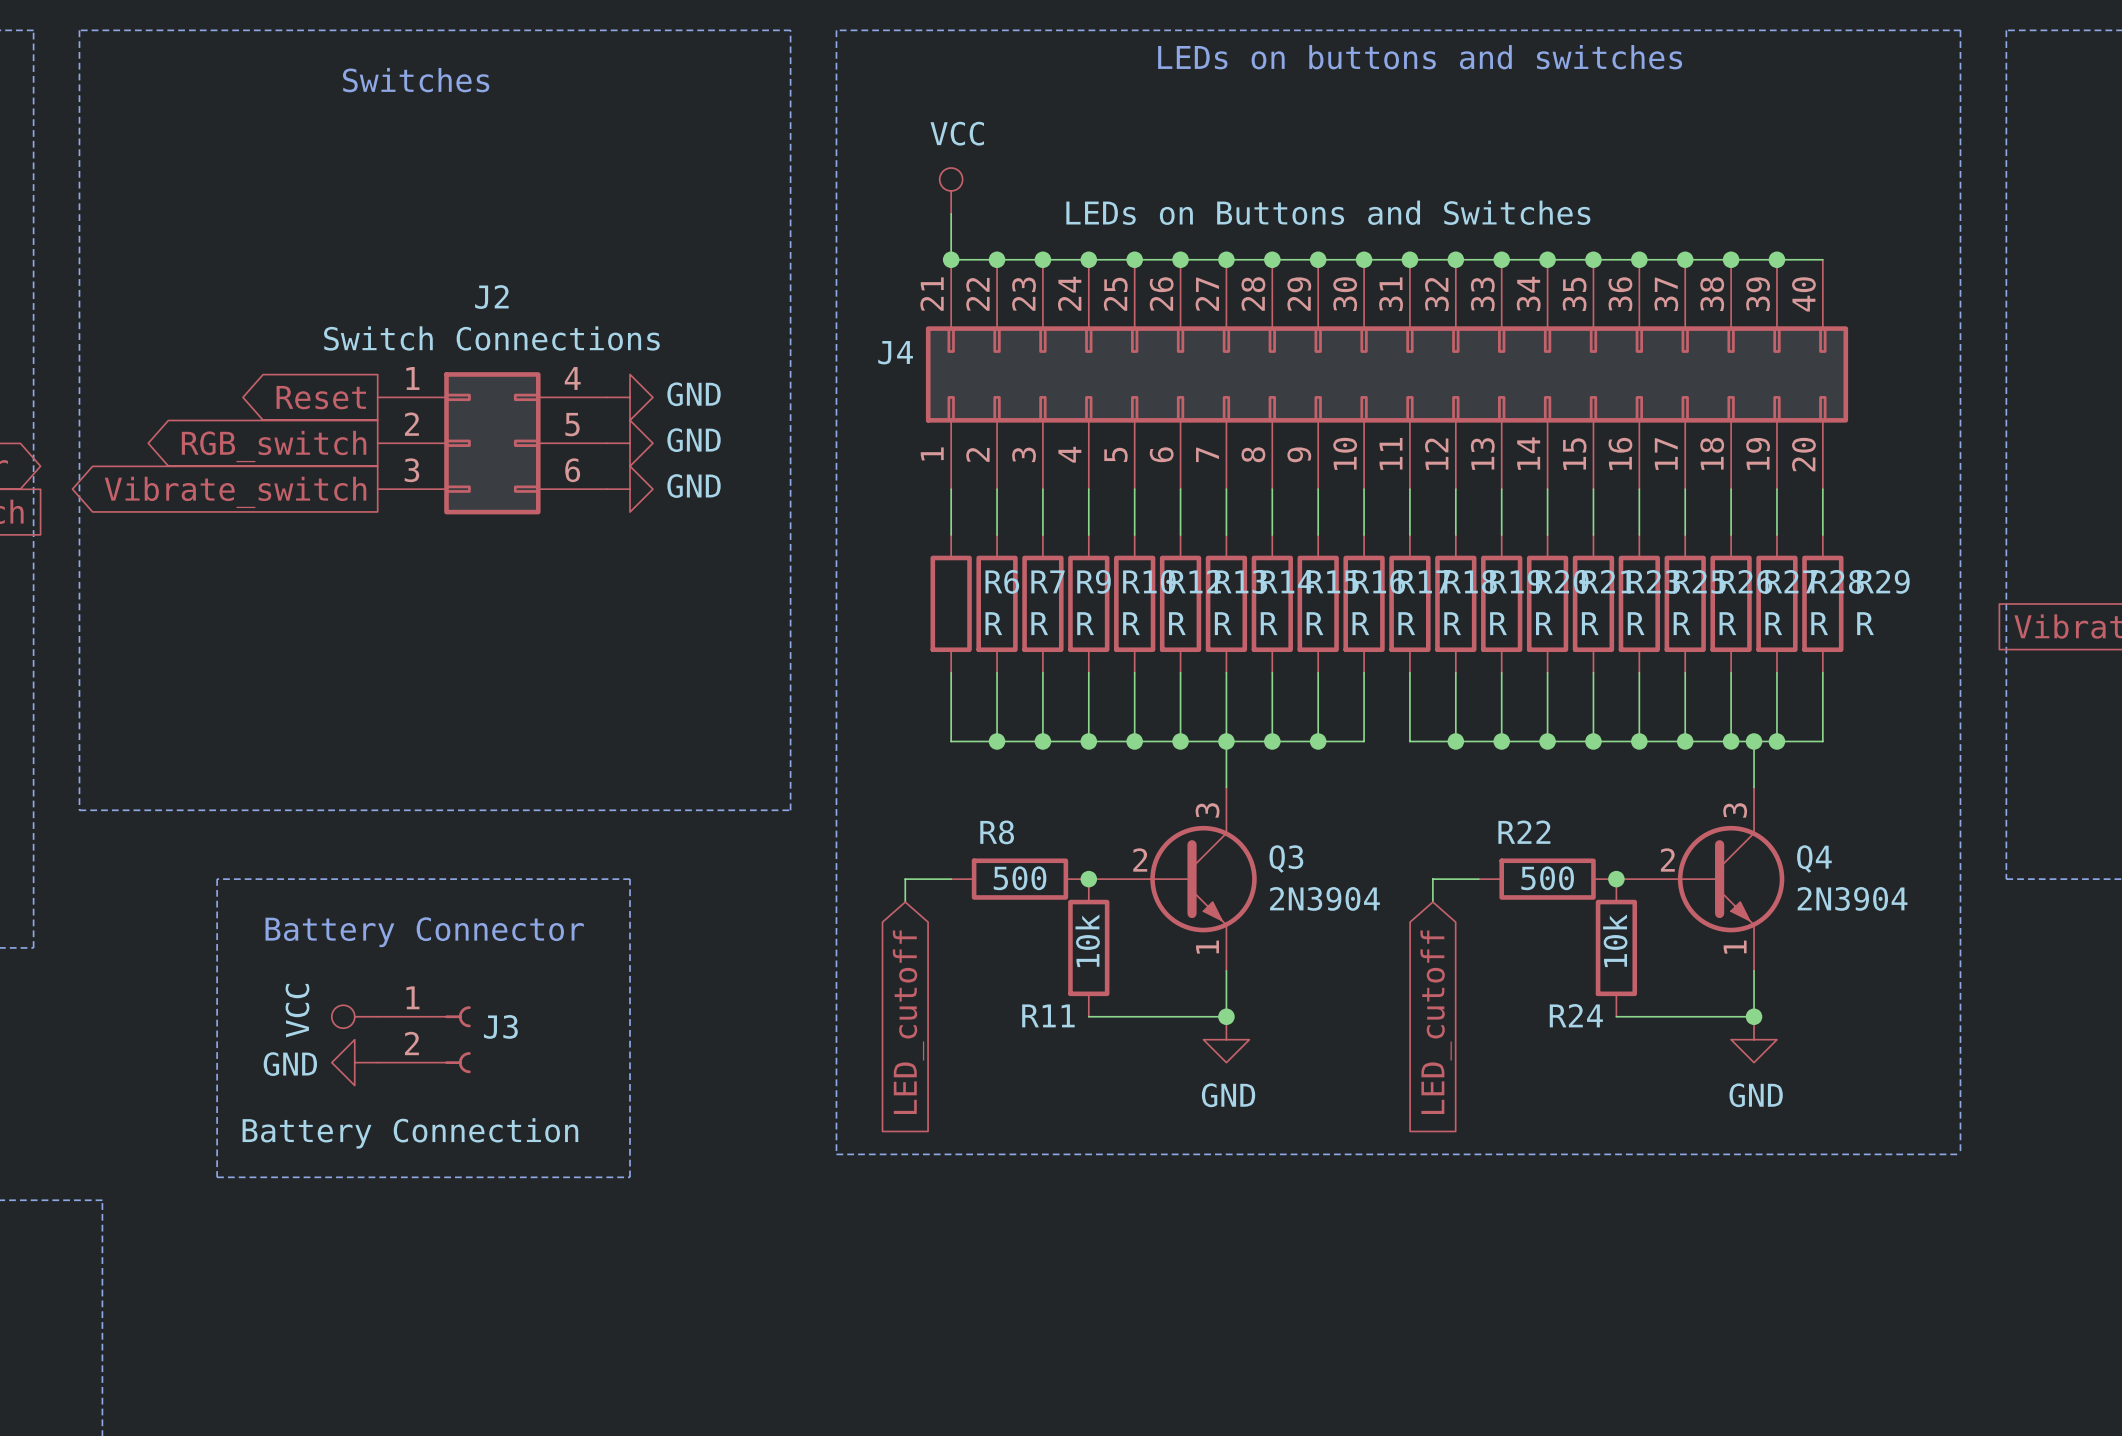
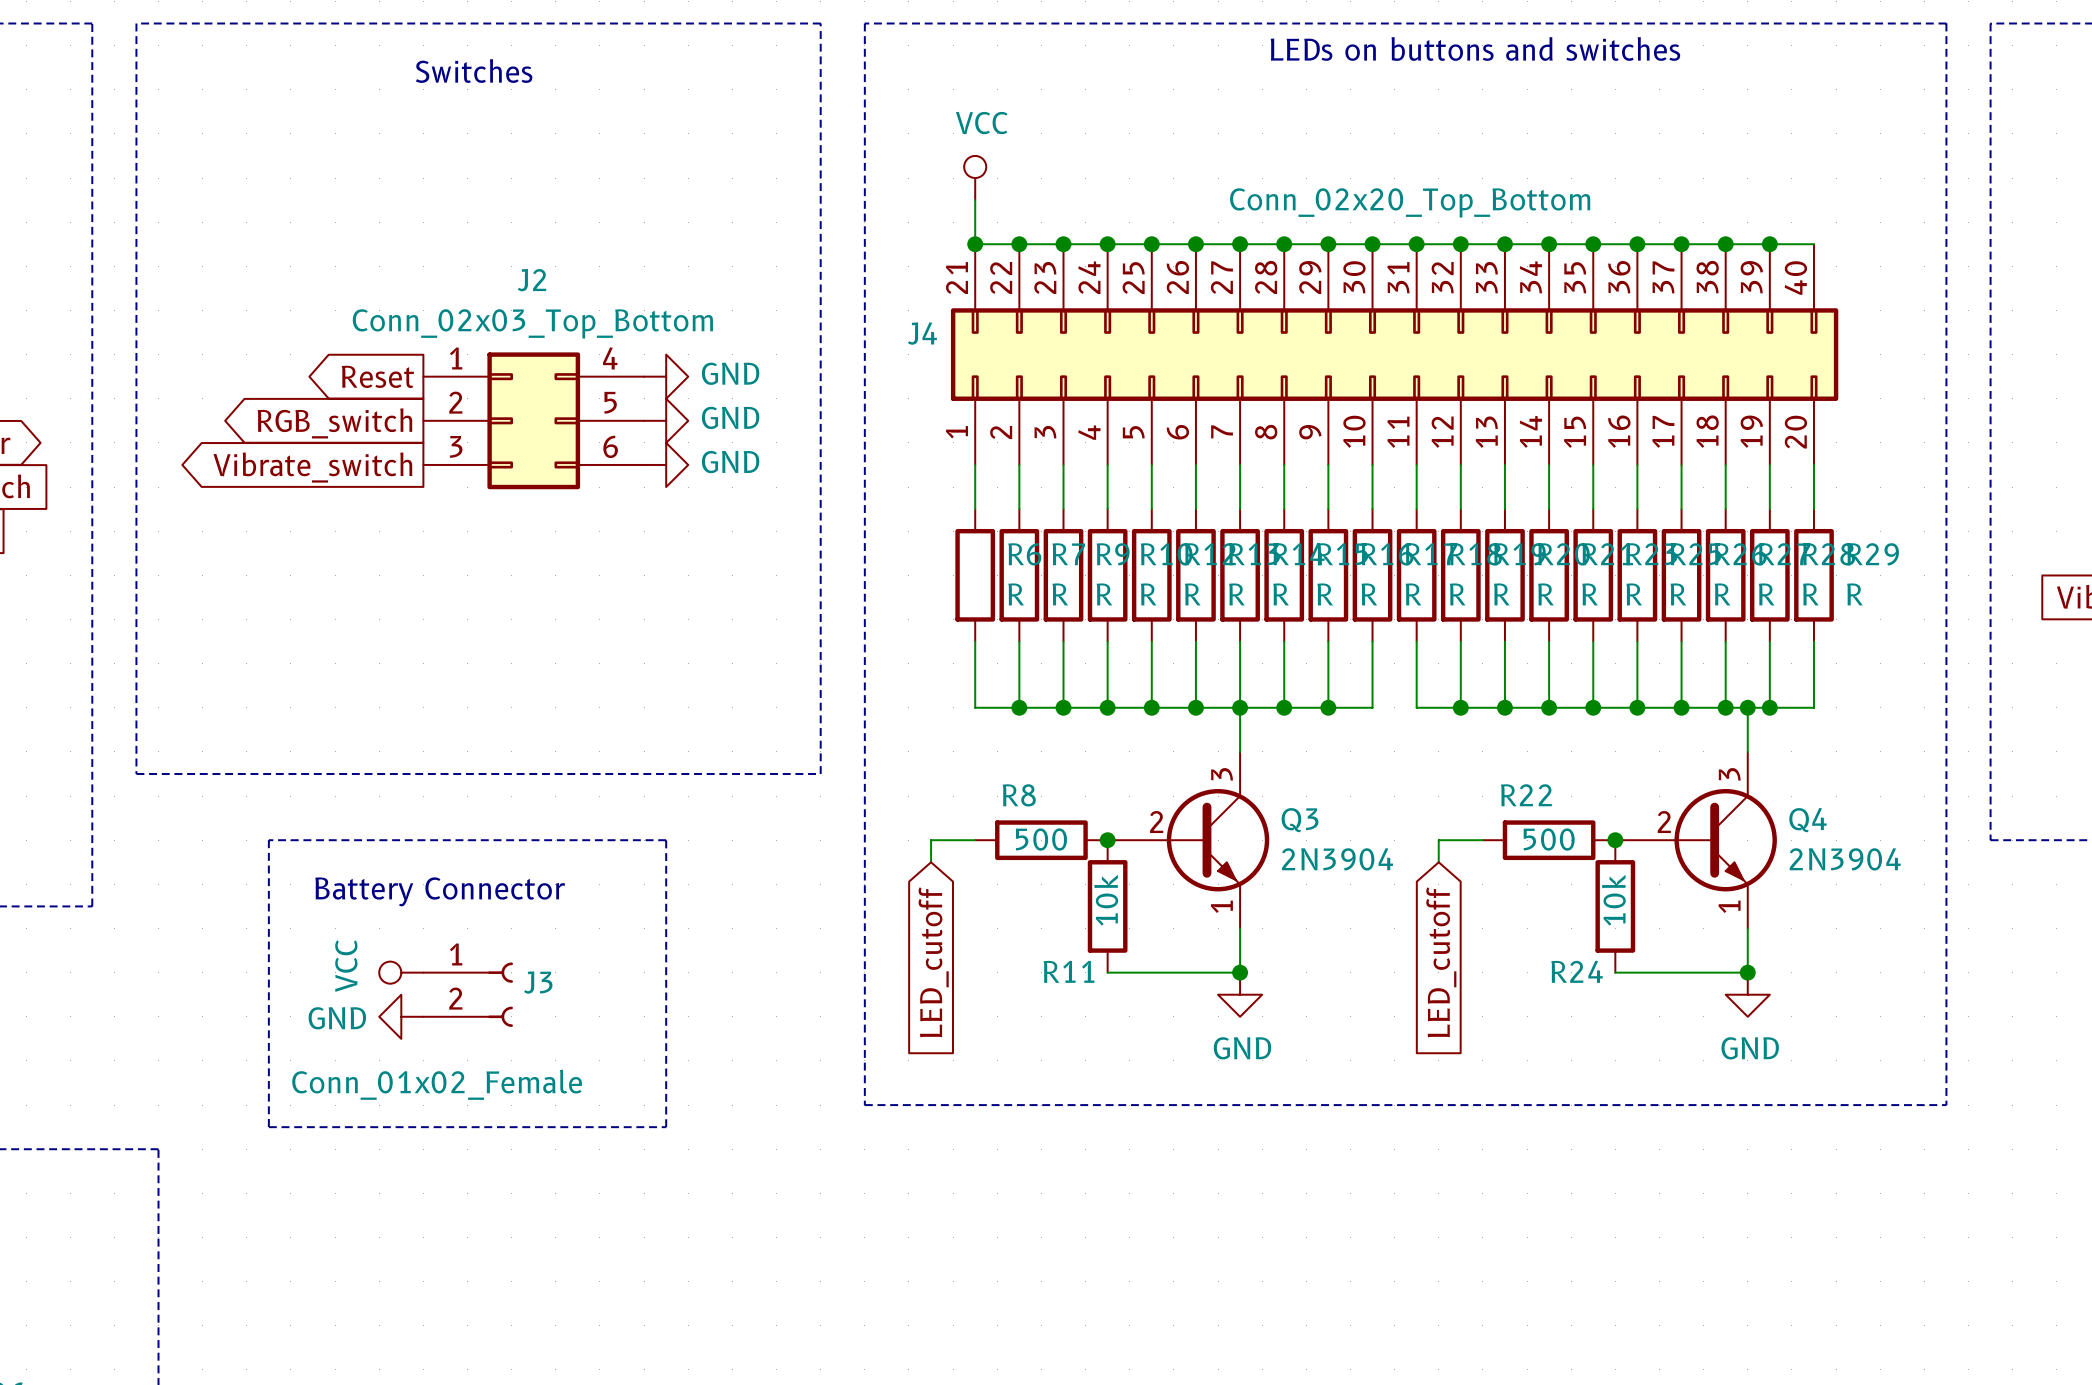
J4 value: LEDs on Buttons and Switches (1328, 212) -> Conn_02x20_Top_Bottom (1410, 202)
J2 value: Switch Connections (491, 338) -> Conn_02x03_Top_Bottom (532, 323)
J3 value: Battery Connection (410, 1133) -> Conn_01x02_Female (437, 1084)

